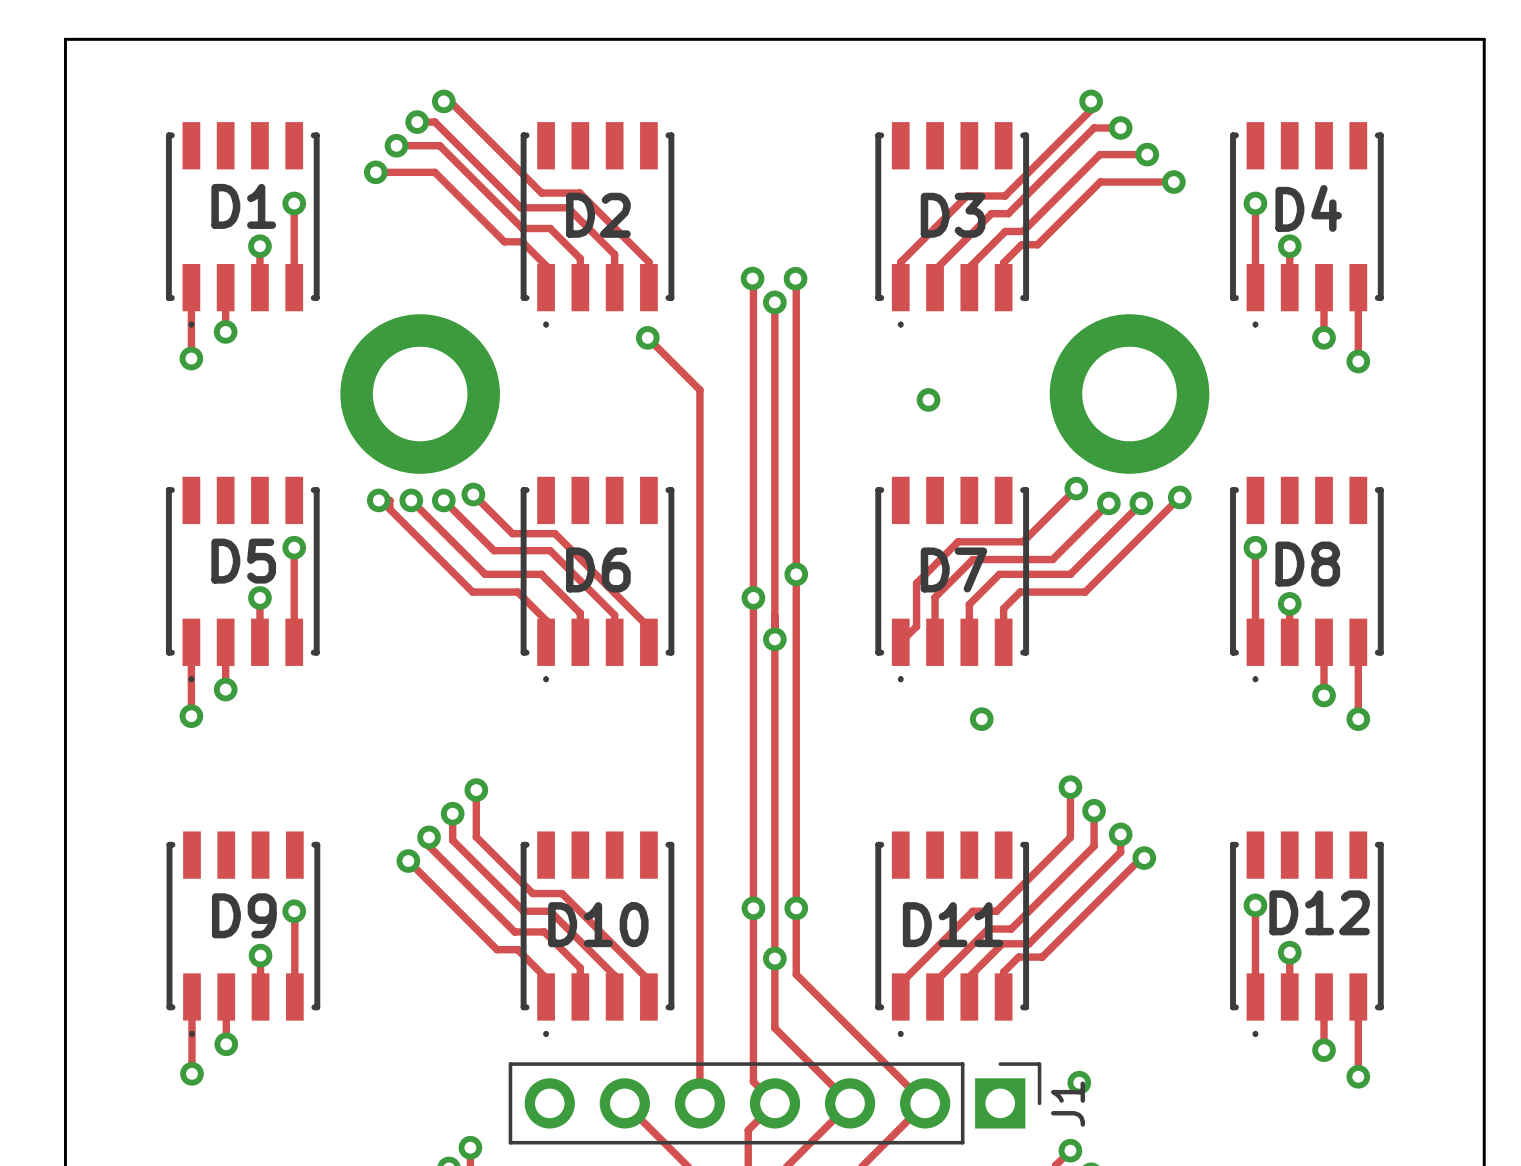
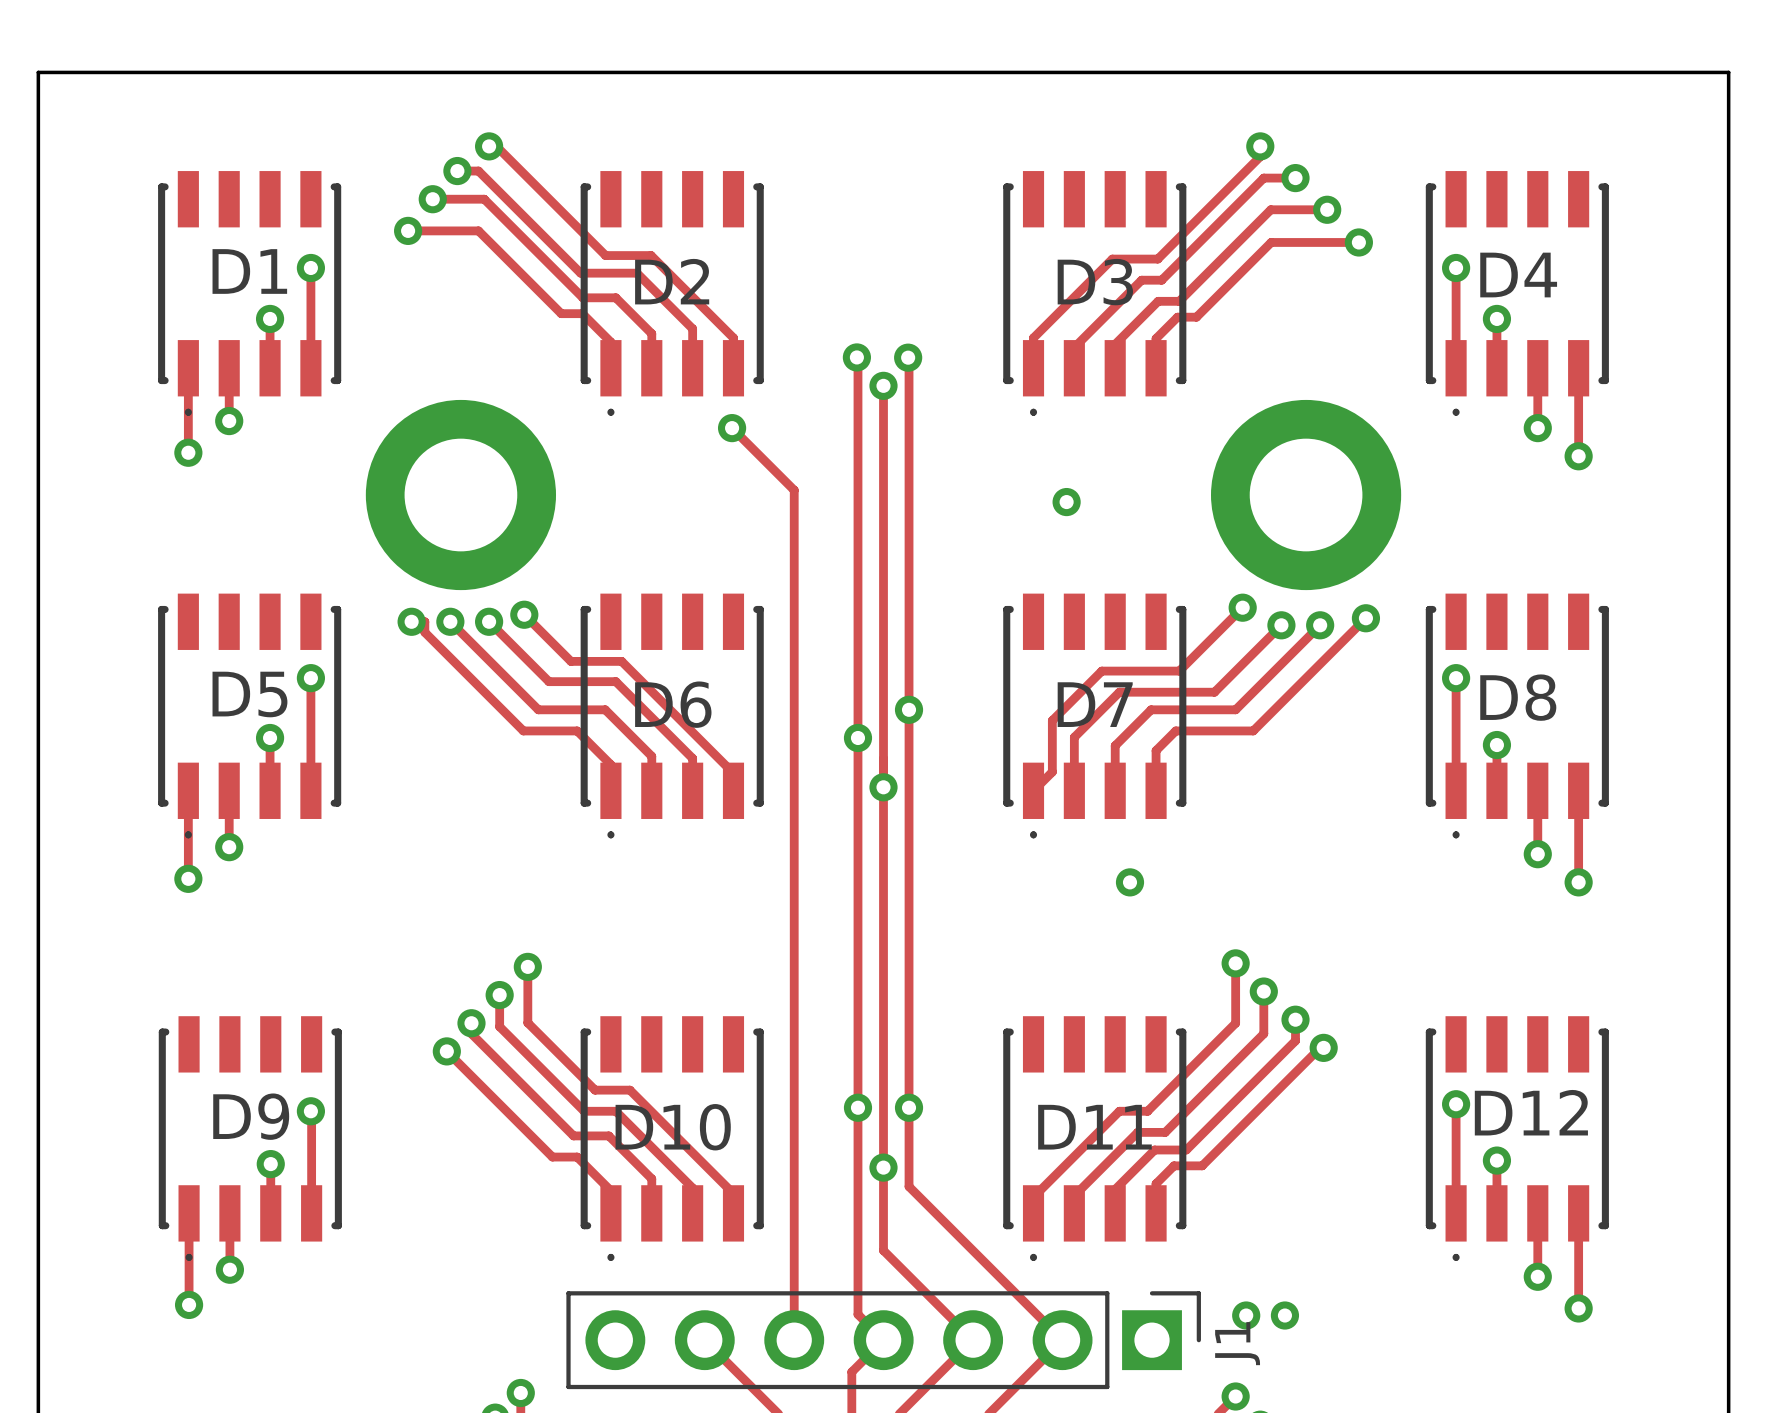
via: none -> (1284, 1315)

